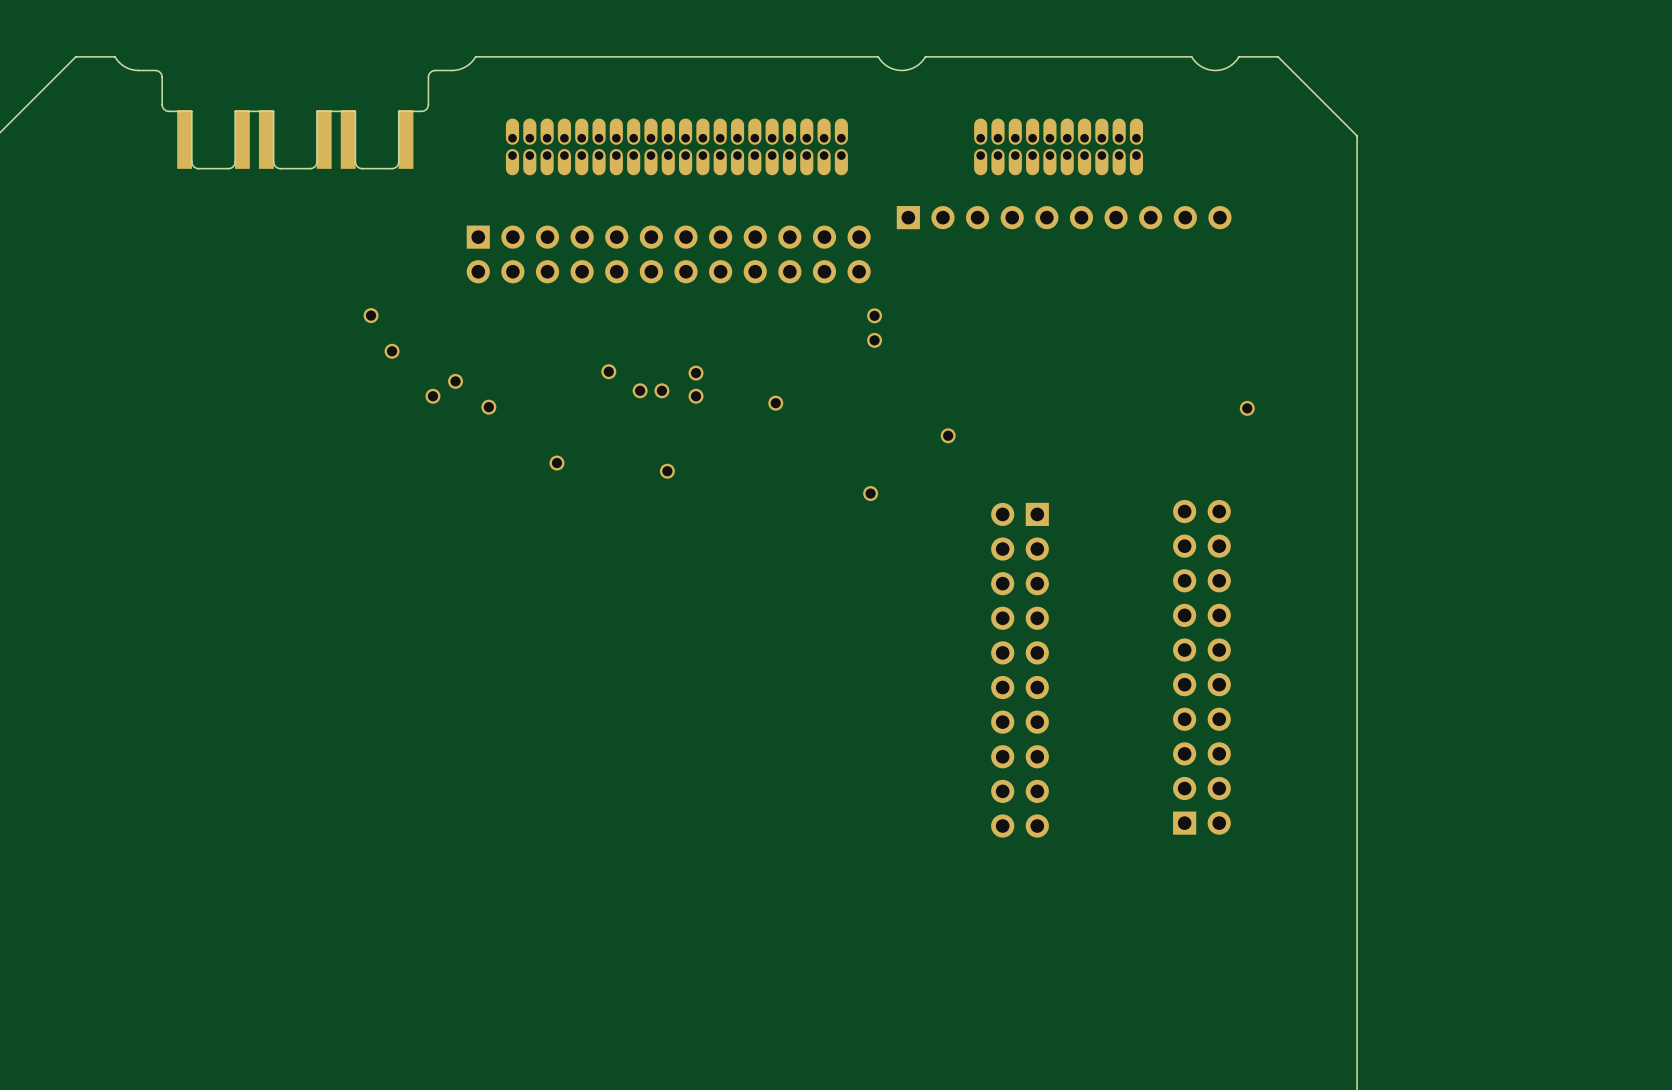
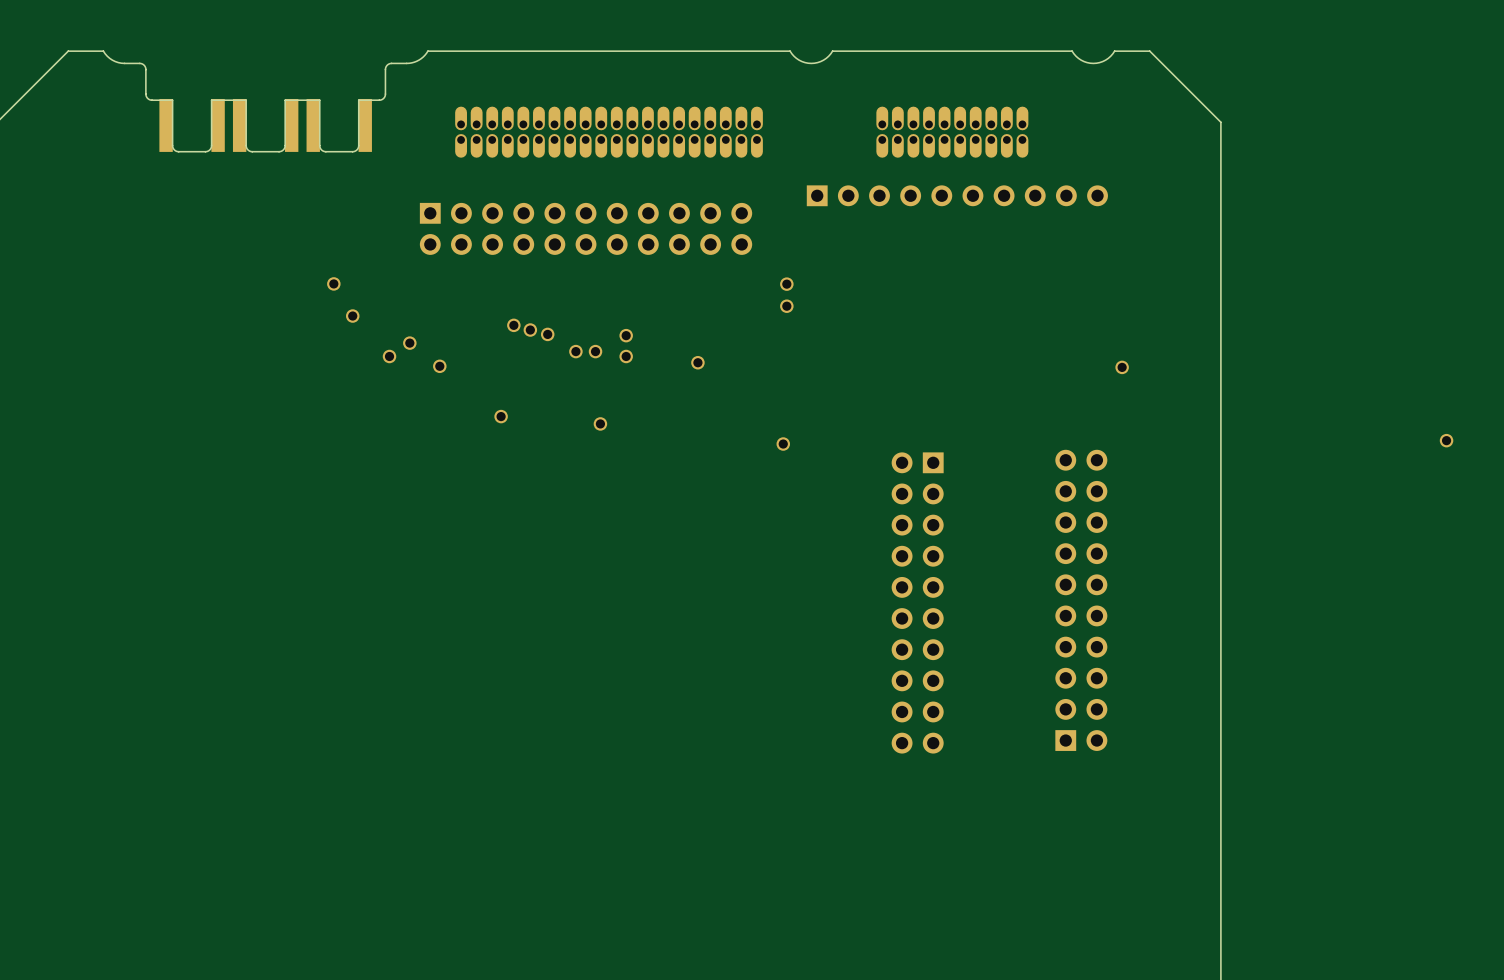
part: (668, 254) -> none
part: none -> (513, 325)
part: none -> (530, 330)
part: (948, 435) -> none
part: none -> (1446, 440)

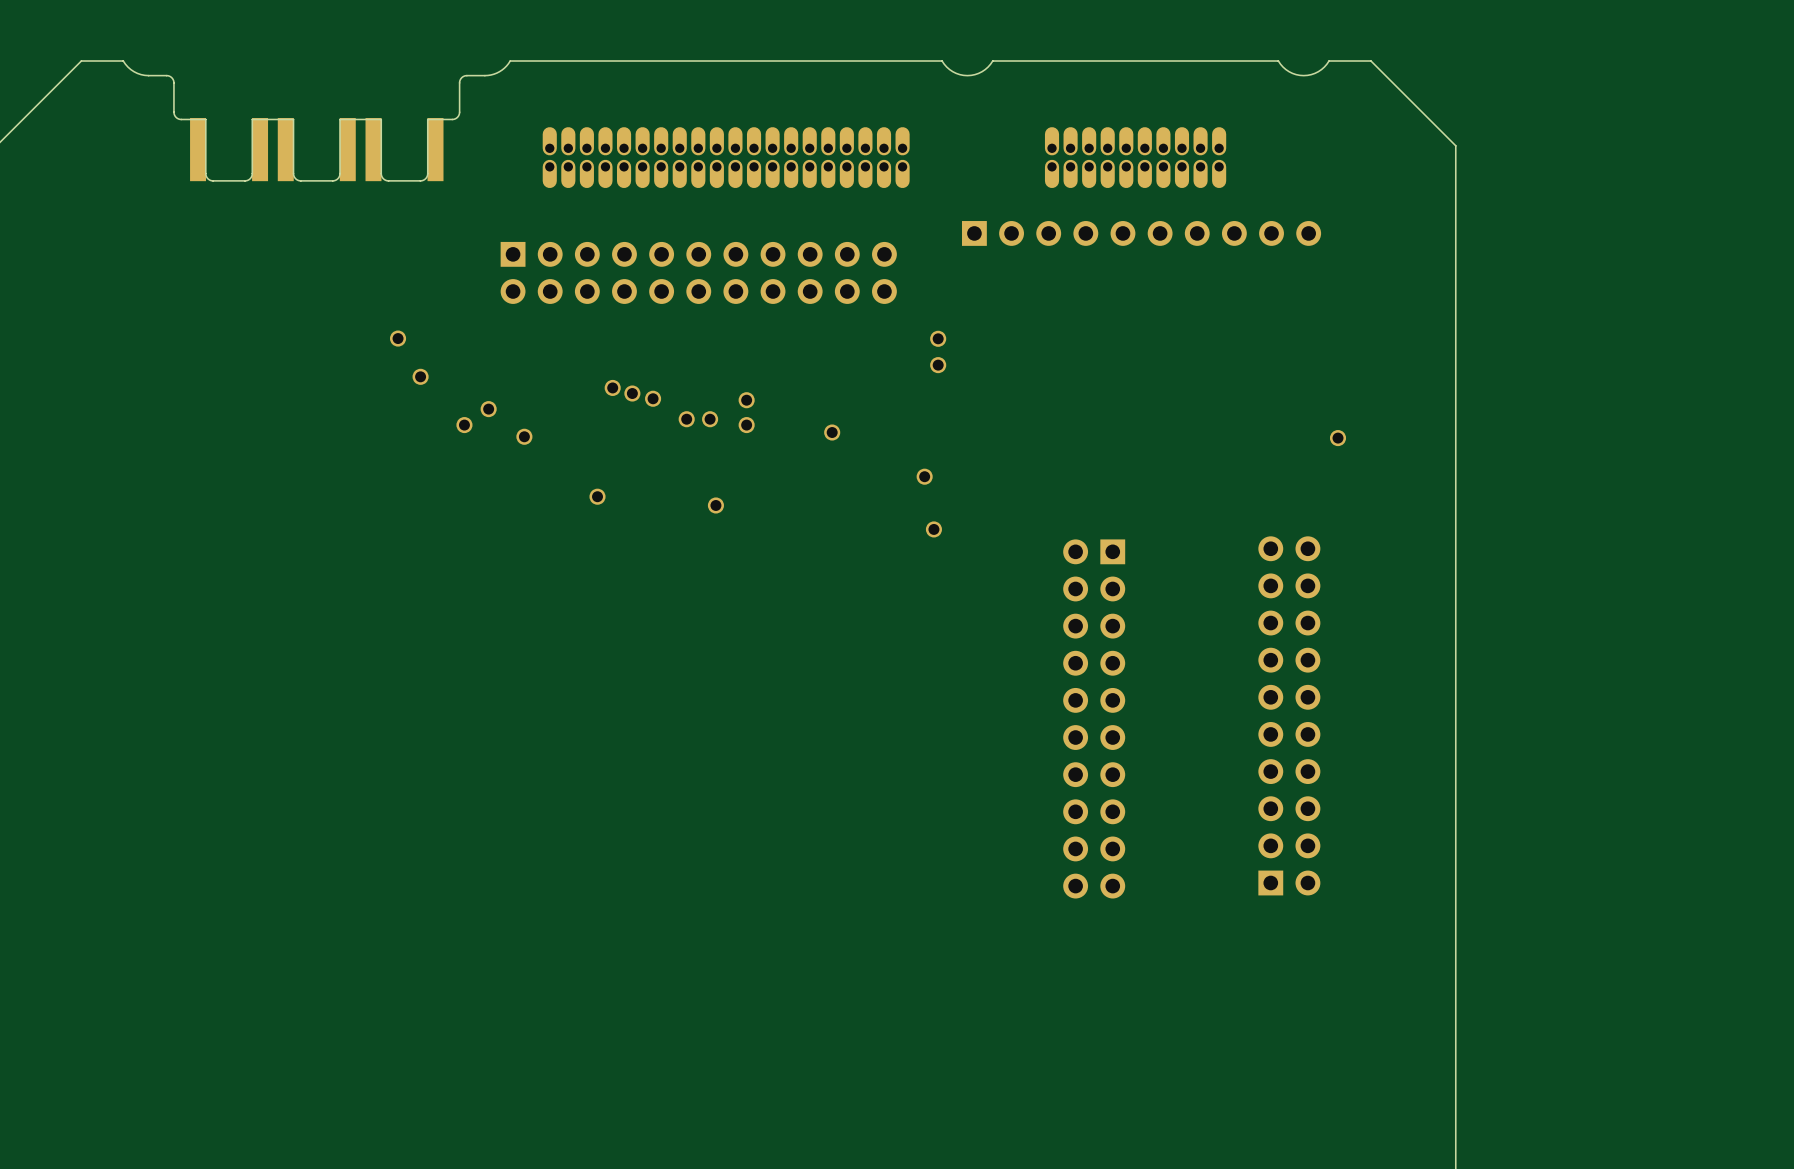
part: none -> (924, 476)
part: (1446, 440) -> none

